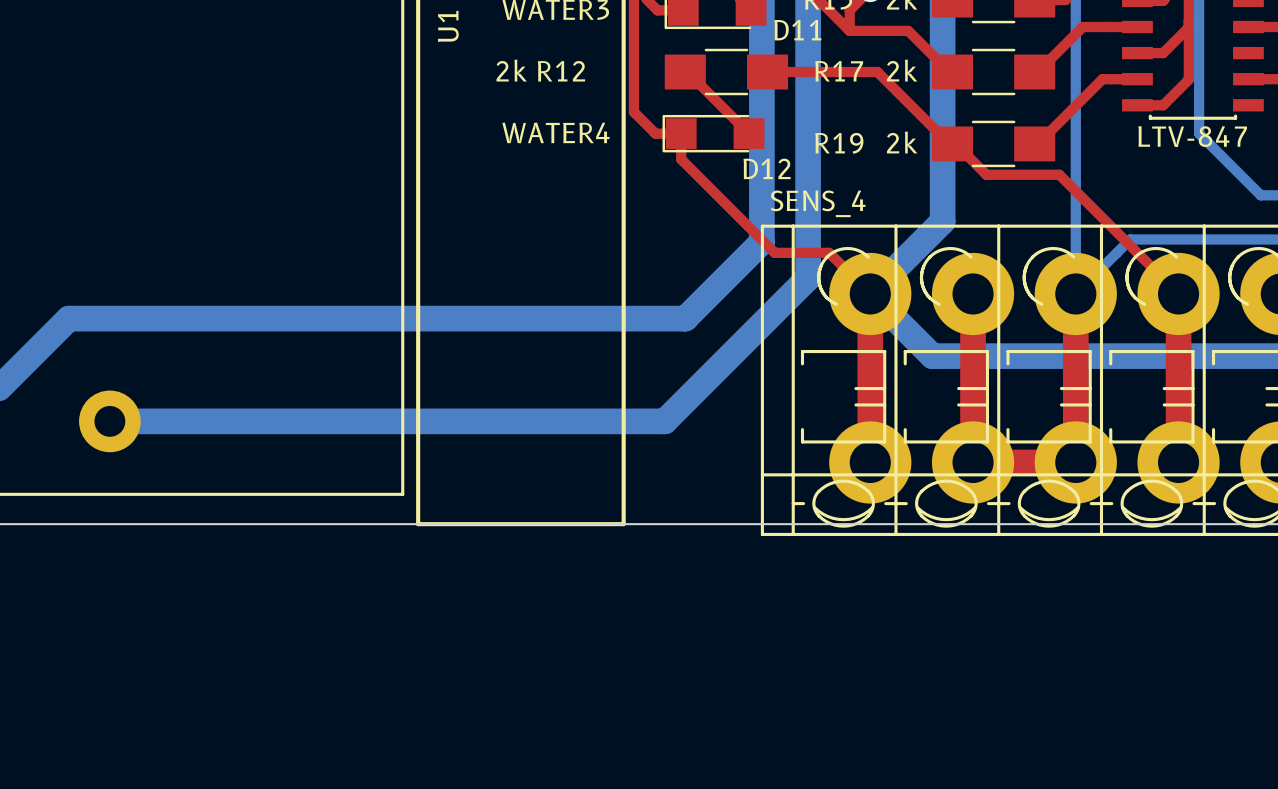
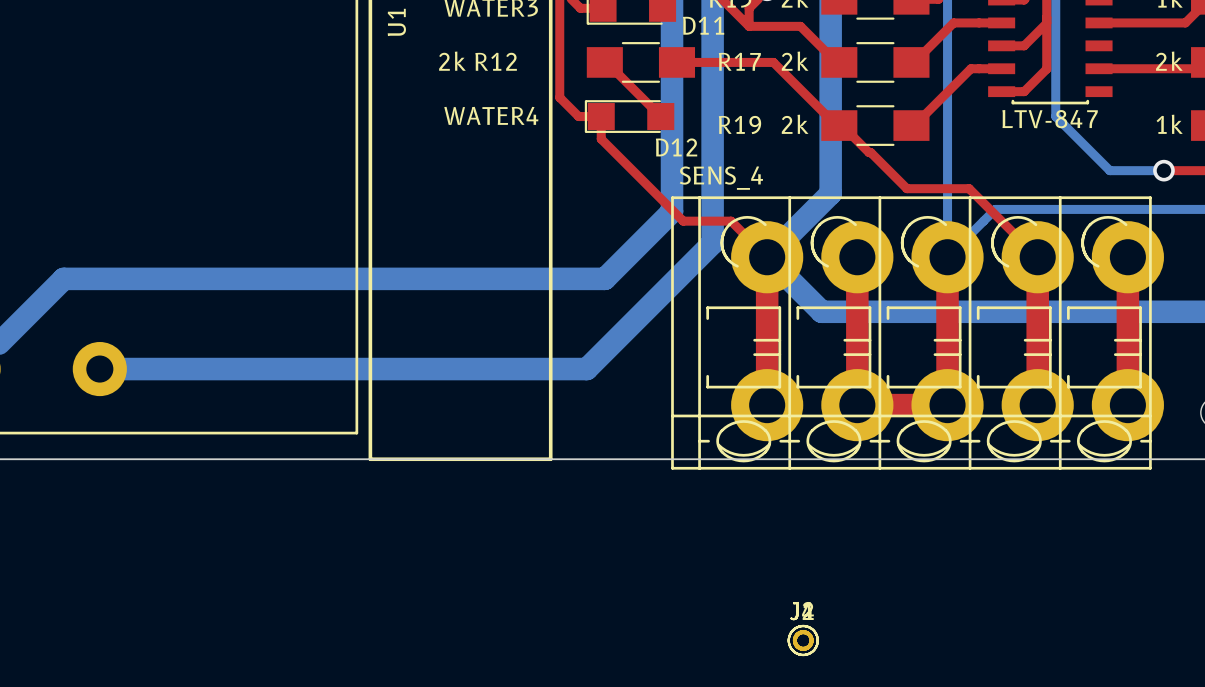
top track: (988, 174) (1059, 174) (1100, 215) -> (870, 152) (906, 188) (969, 188)
part: none -> (803, 640)
part: none -> (803, 640)
part: none -> (803, 640)

